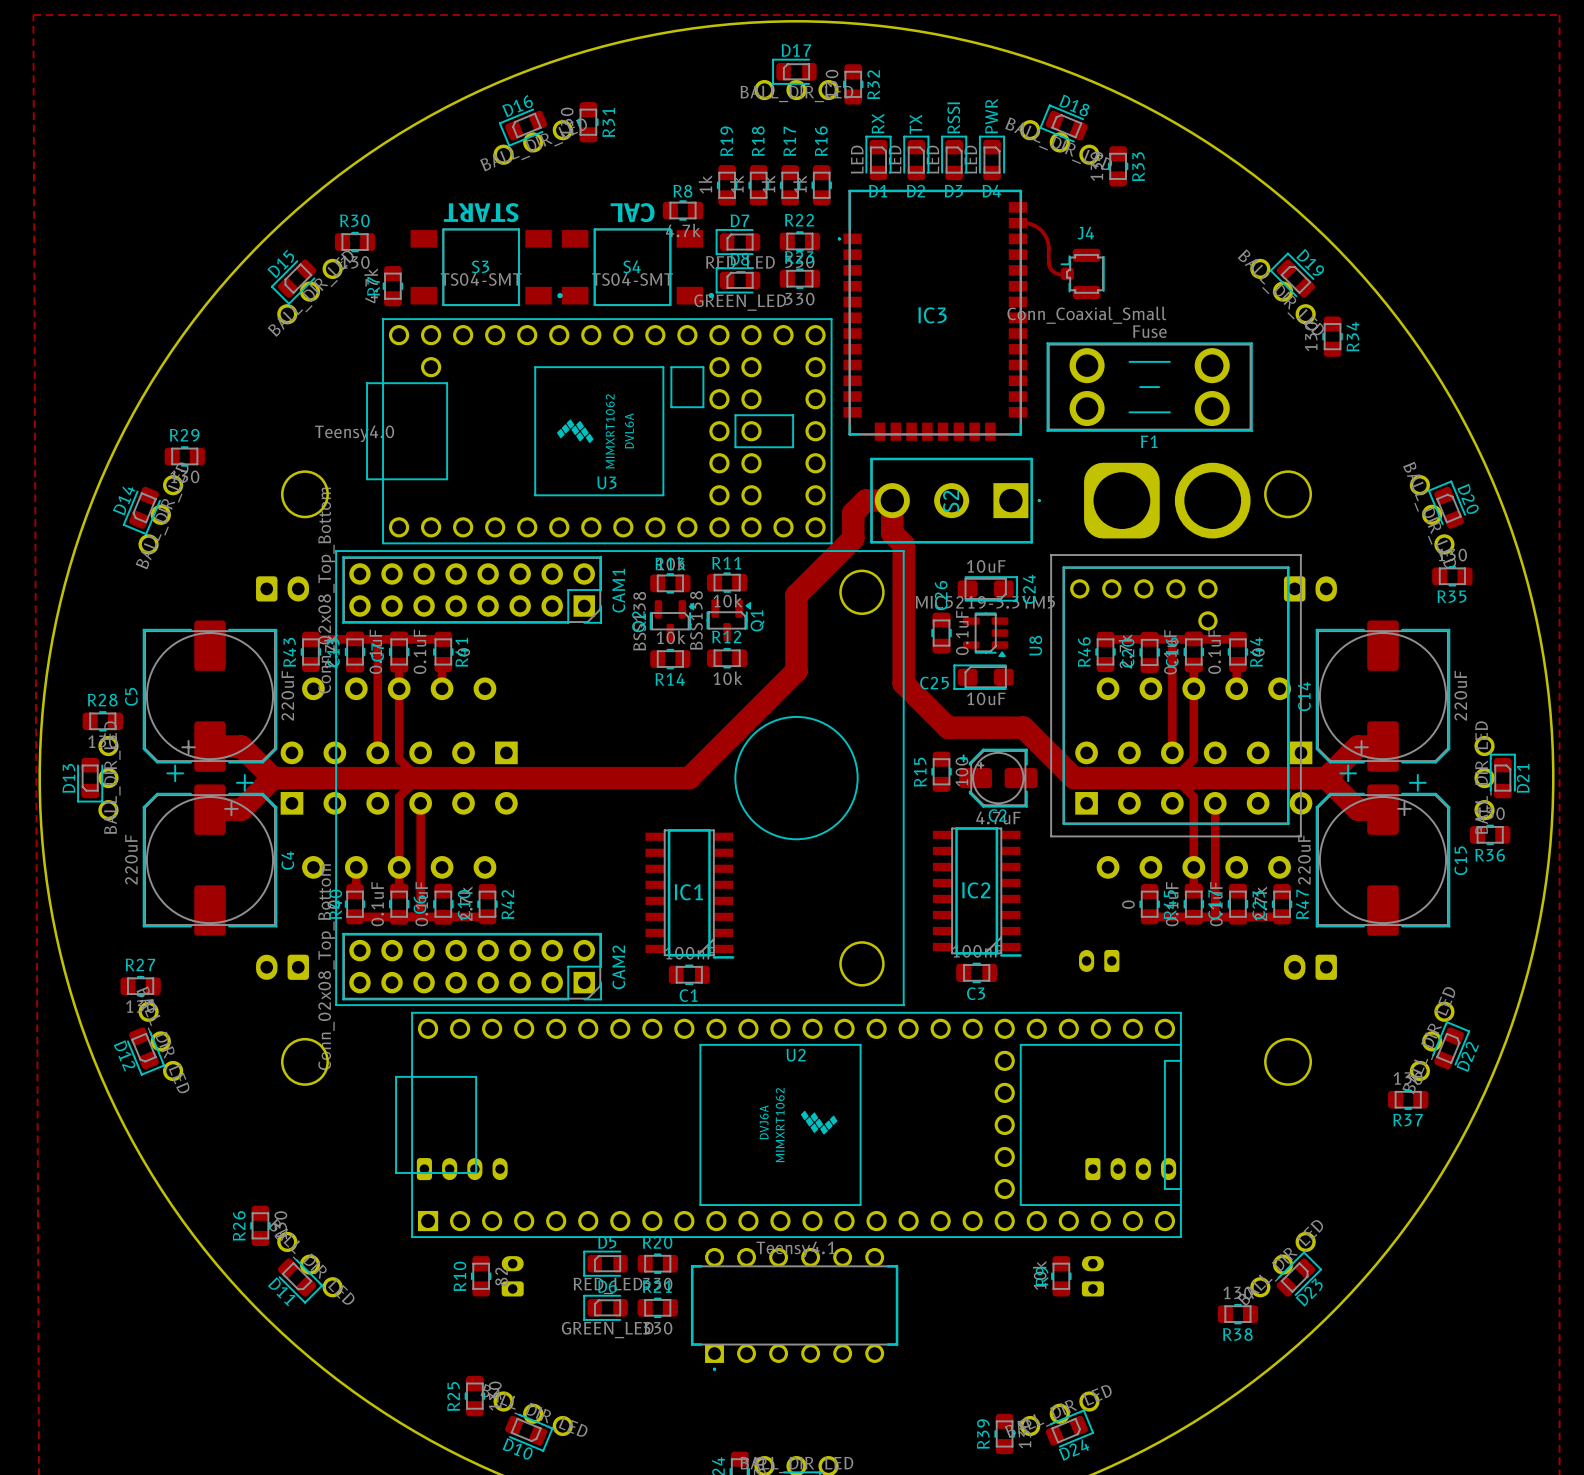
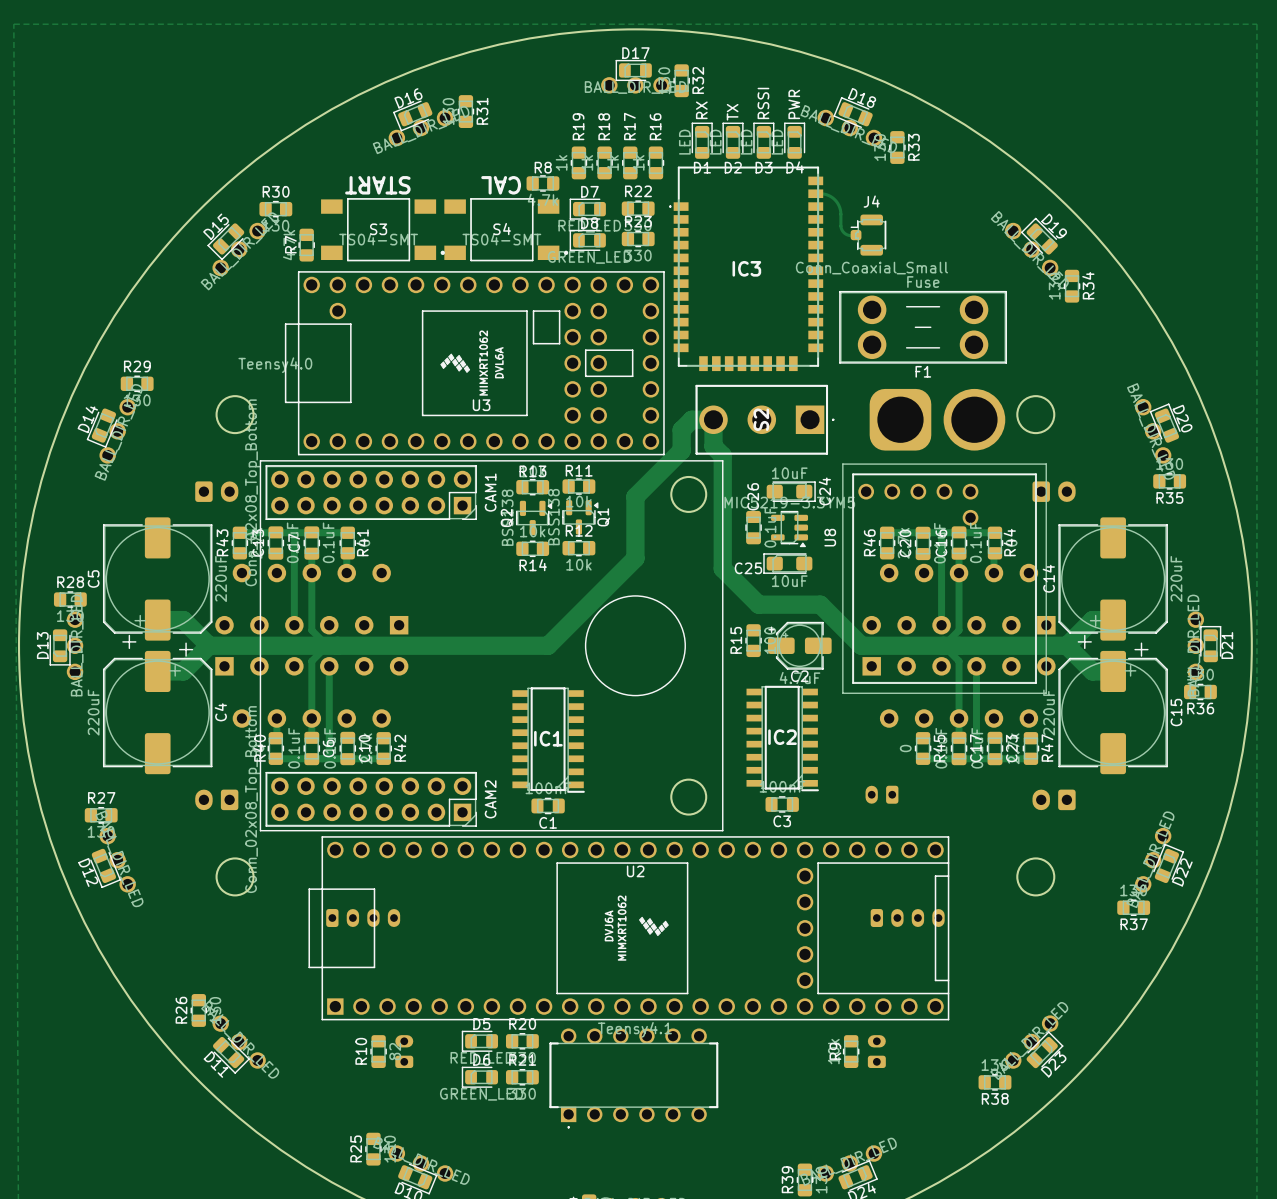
part position: (462, 1169) -> (363, 918)
part position: (1130, 1169) -> (907, 918)

